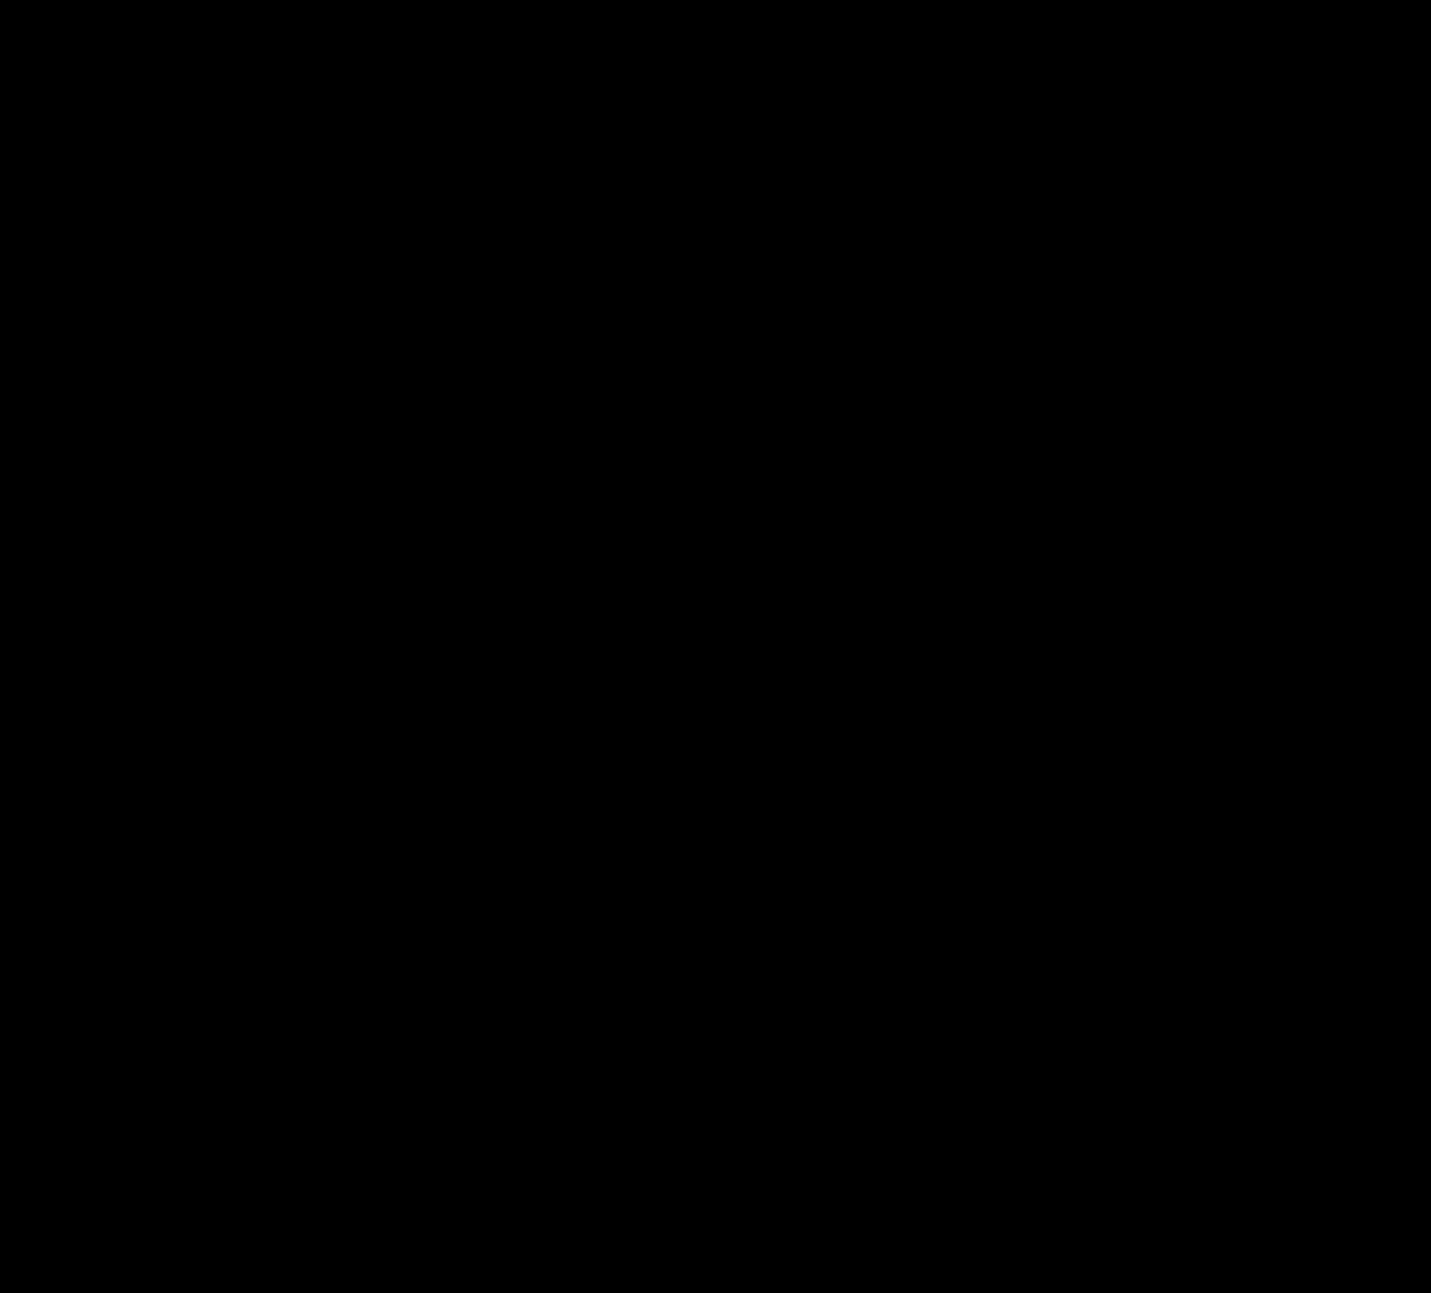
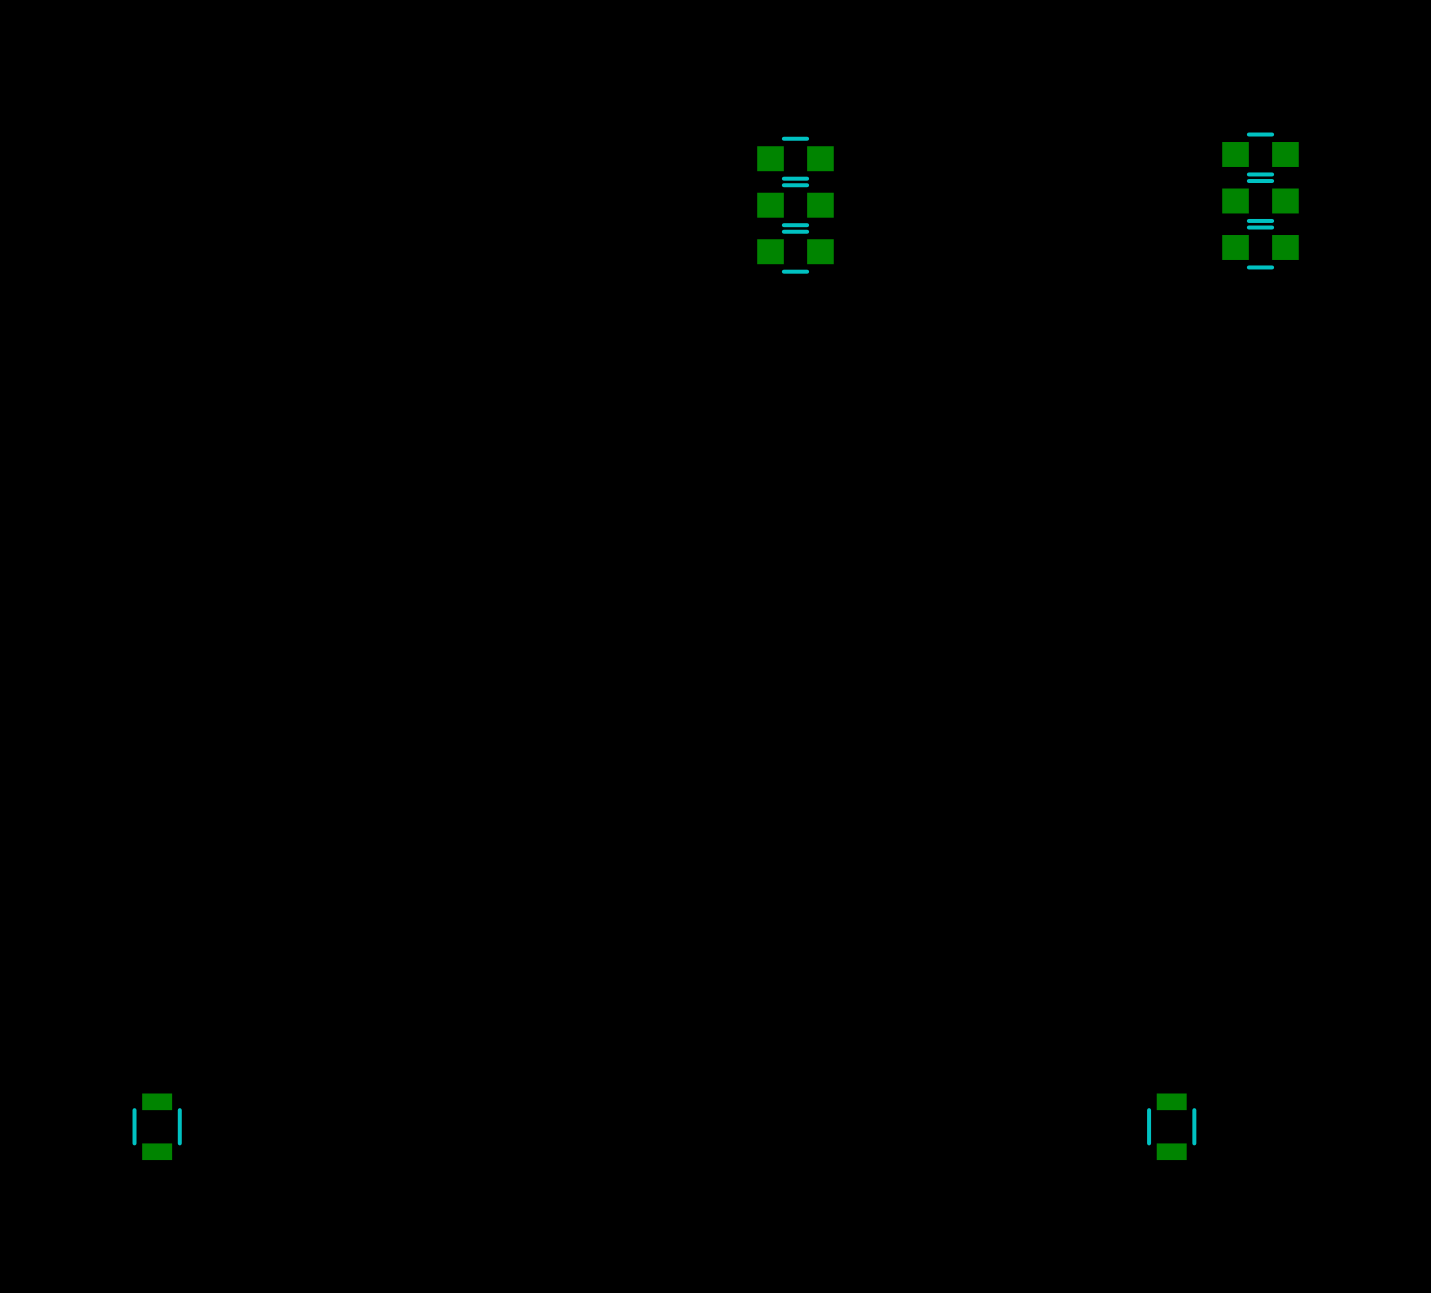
part: none -> (1260, 154)
part: none -> (795, 158)
part: none -> (1260, 200)
part: none -> (795, 205)
part: none -> (1260, 247)
part: none -> (795, 251)
part: none -> (157, 1126)
part: none -> (1171, 1126)

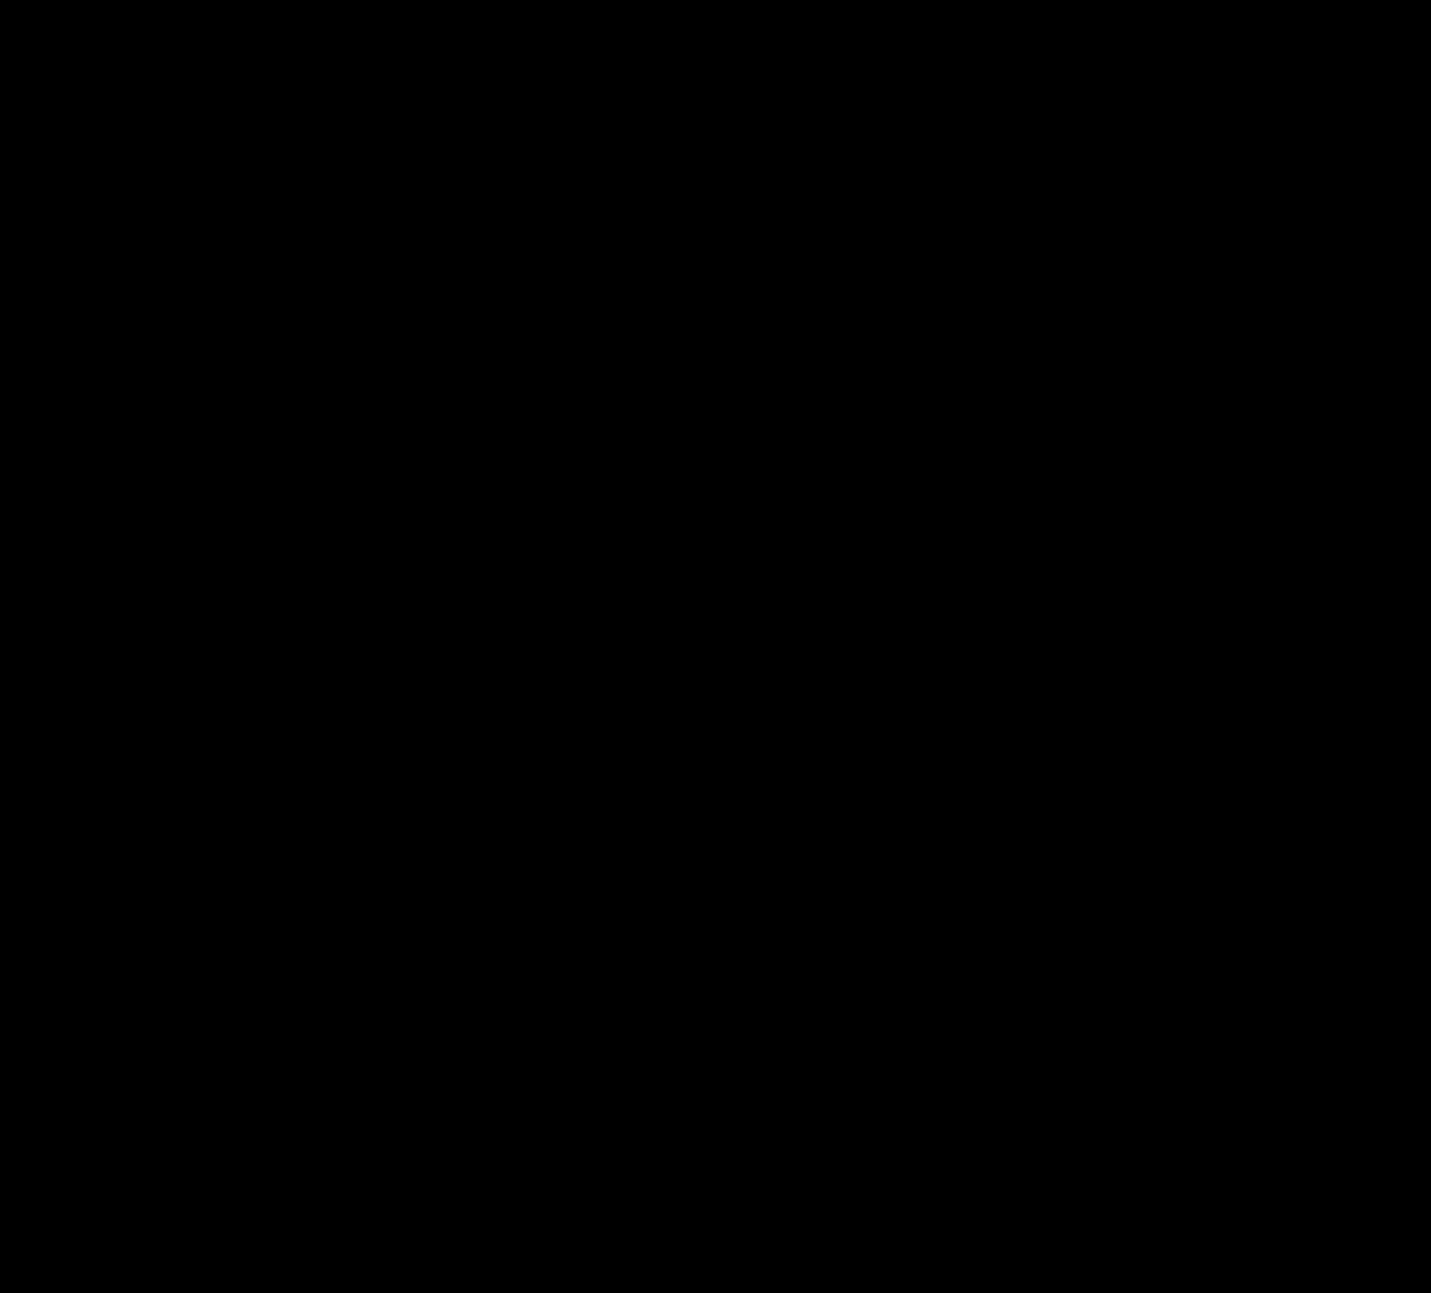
part: (1260, 154) -> none
part: (795, 158) -> none
part: (1260, 200) -> none
part: (795, 205) -> none
part: (1260, 247) -> none
part: (795, 251) -> none
part: (157, 1126) -> none
part: (1171, 1126) -> none

